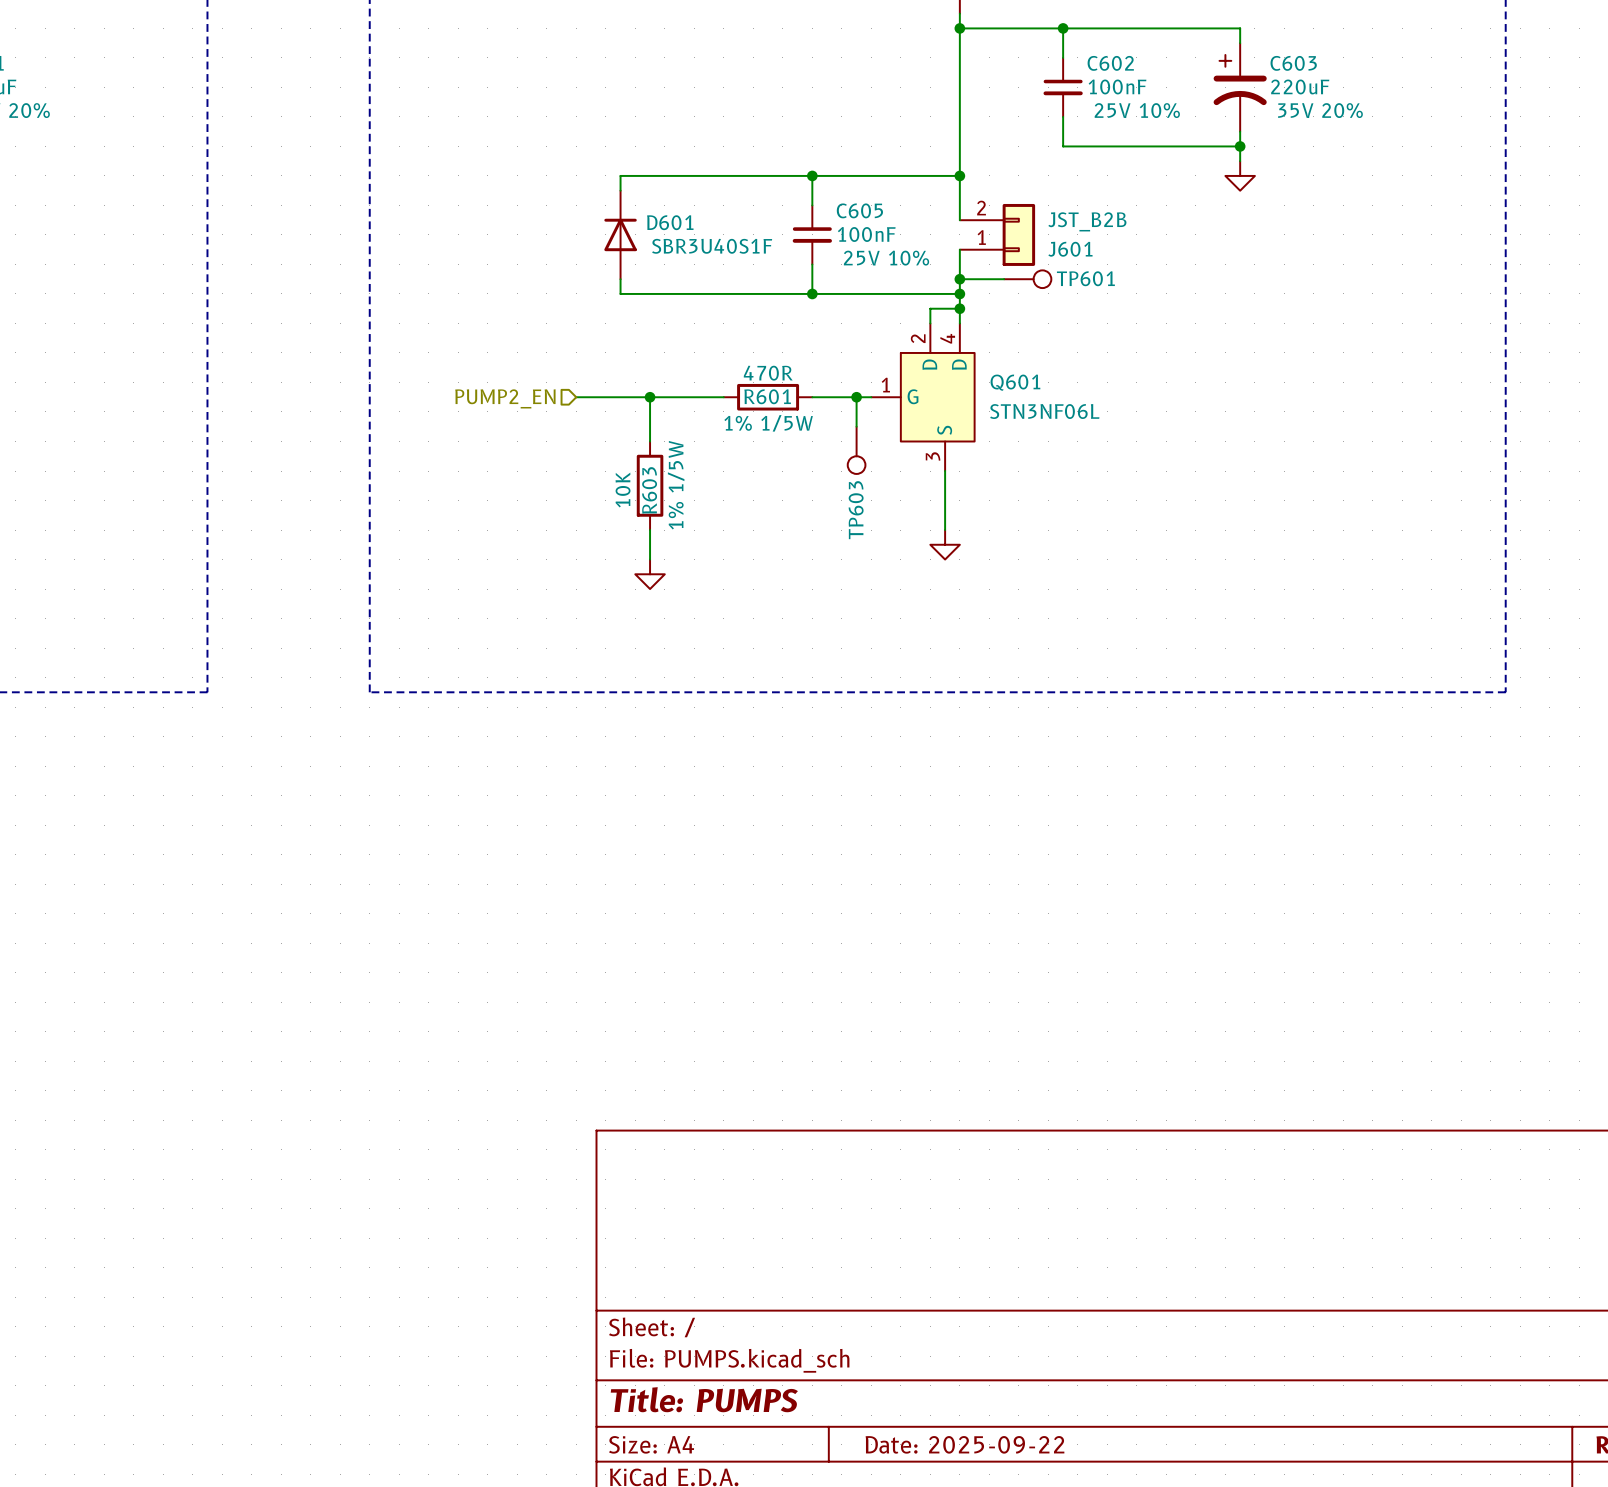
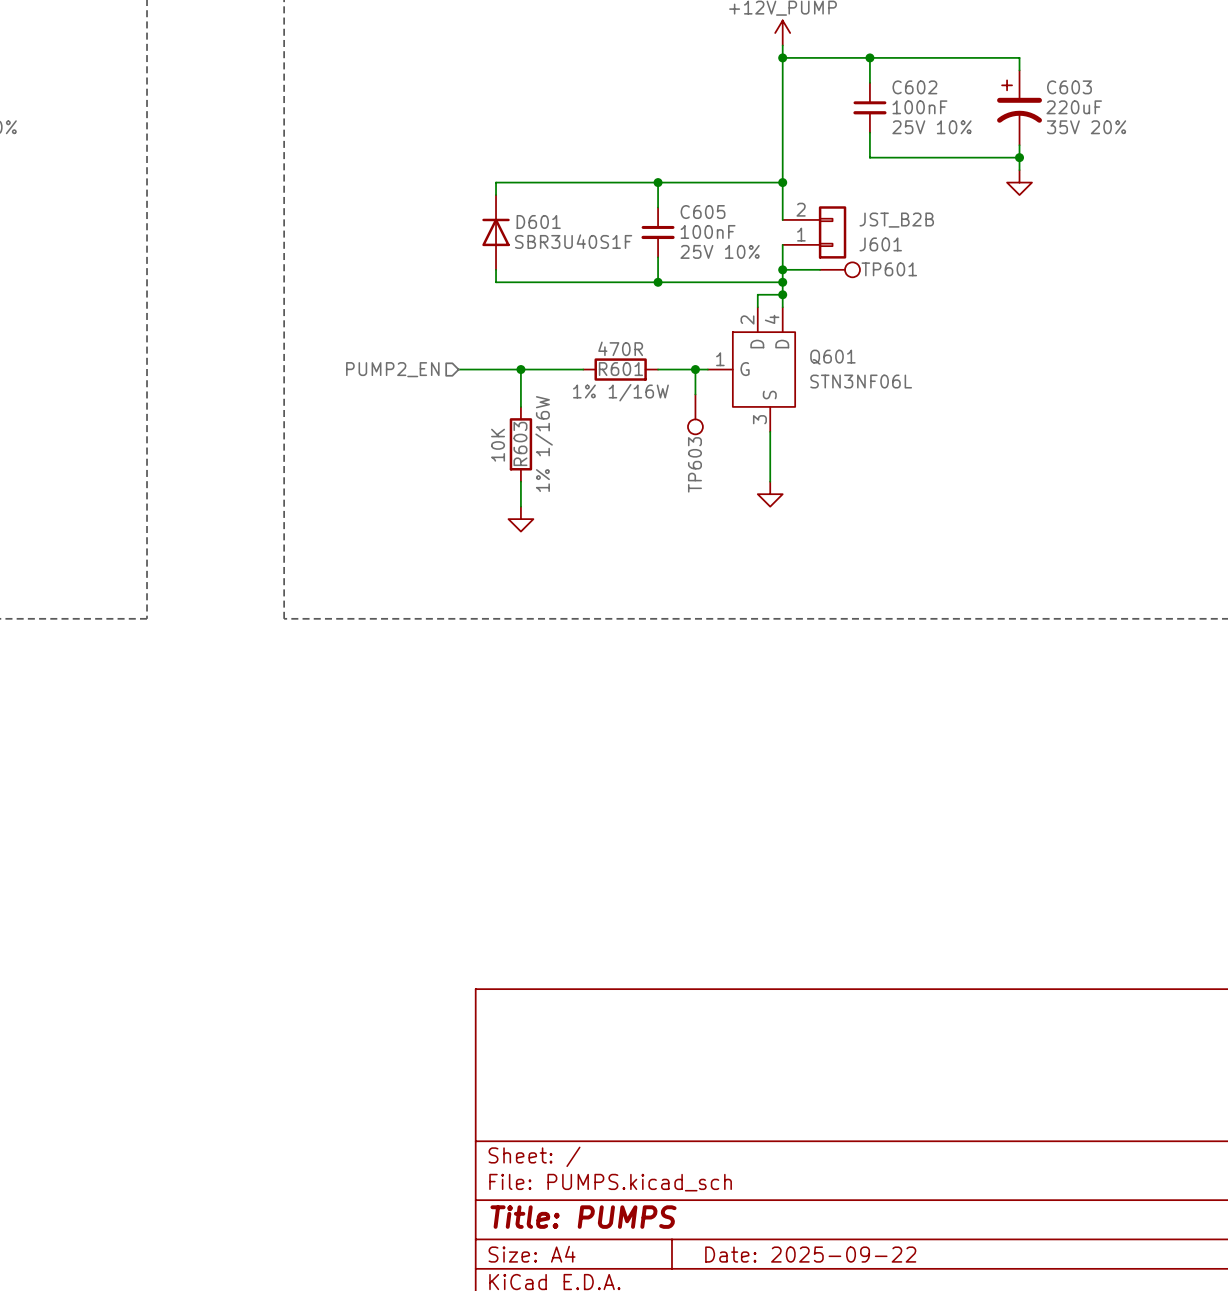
R601 text: 1% 1/5W (768, 423) -> 1% 1/16W (620, 392)
R603 text: 1% 1/5W (676, 485) -> 1% 1/16W (544, 444)

